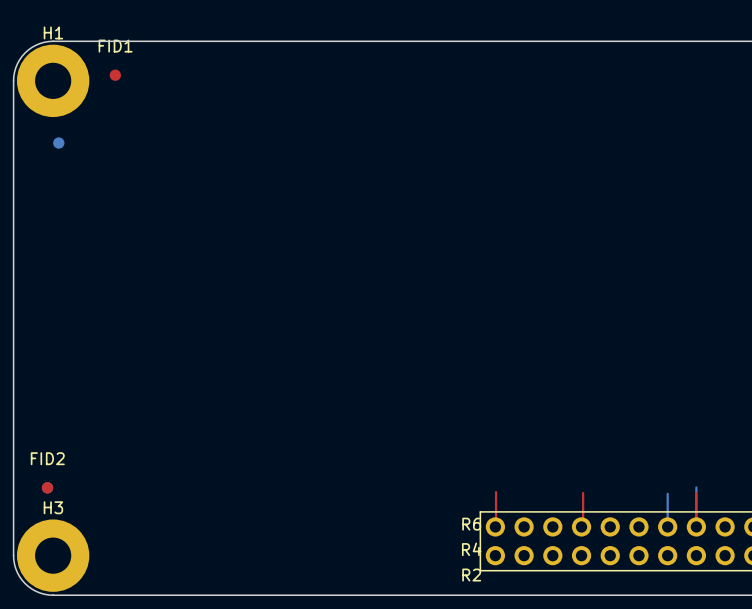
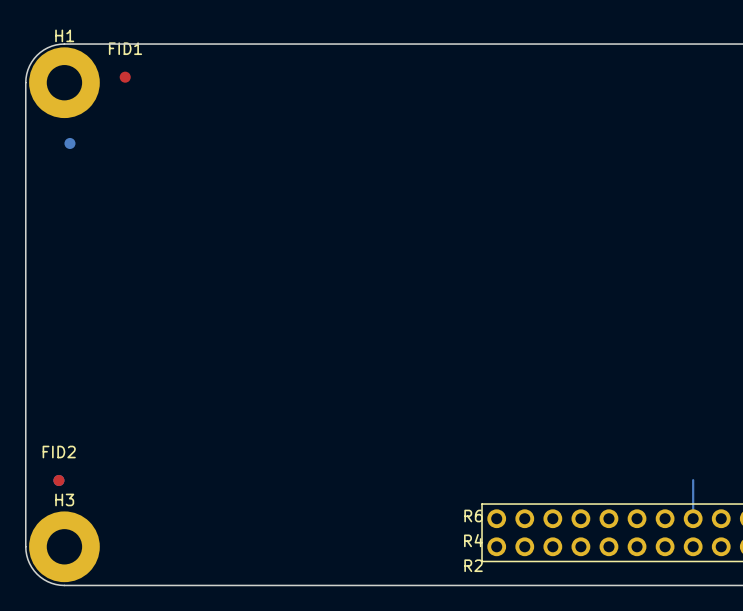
top track: (496, 492) (495, 526) -> none
top track: (583, 493) (583, 525) (581, 526) -> none
bottom track: (667, 493) (667, 526) -> none
top track: (696, 493) (696, 526) -> none

